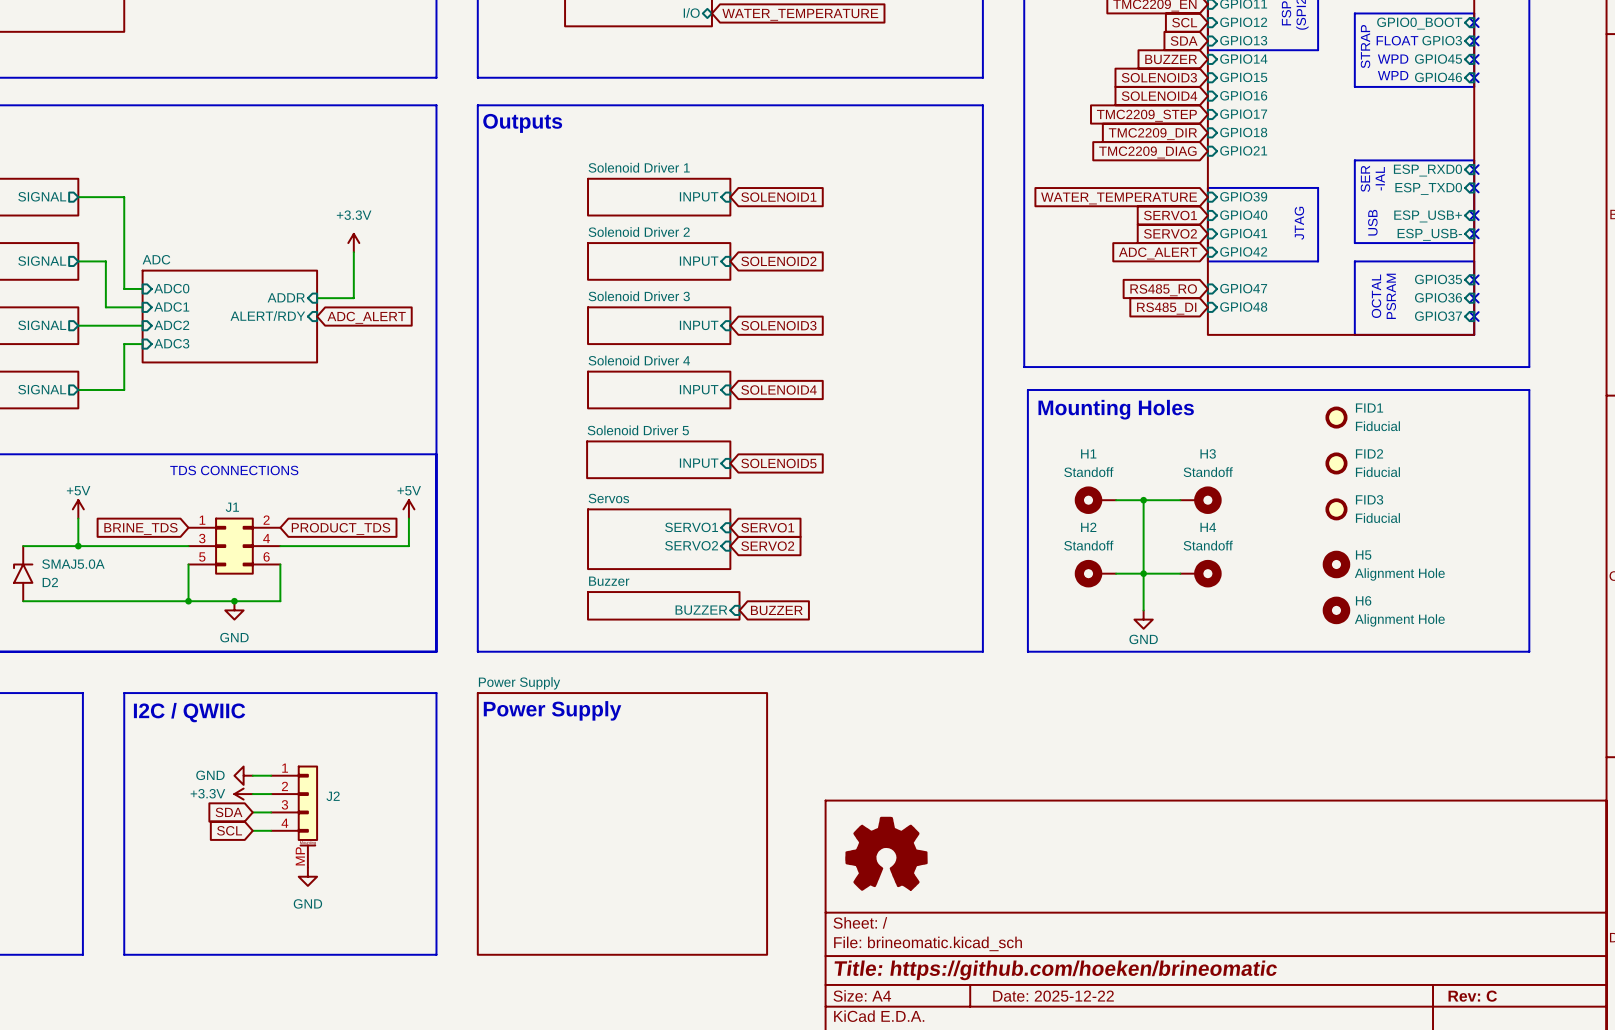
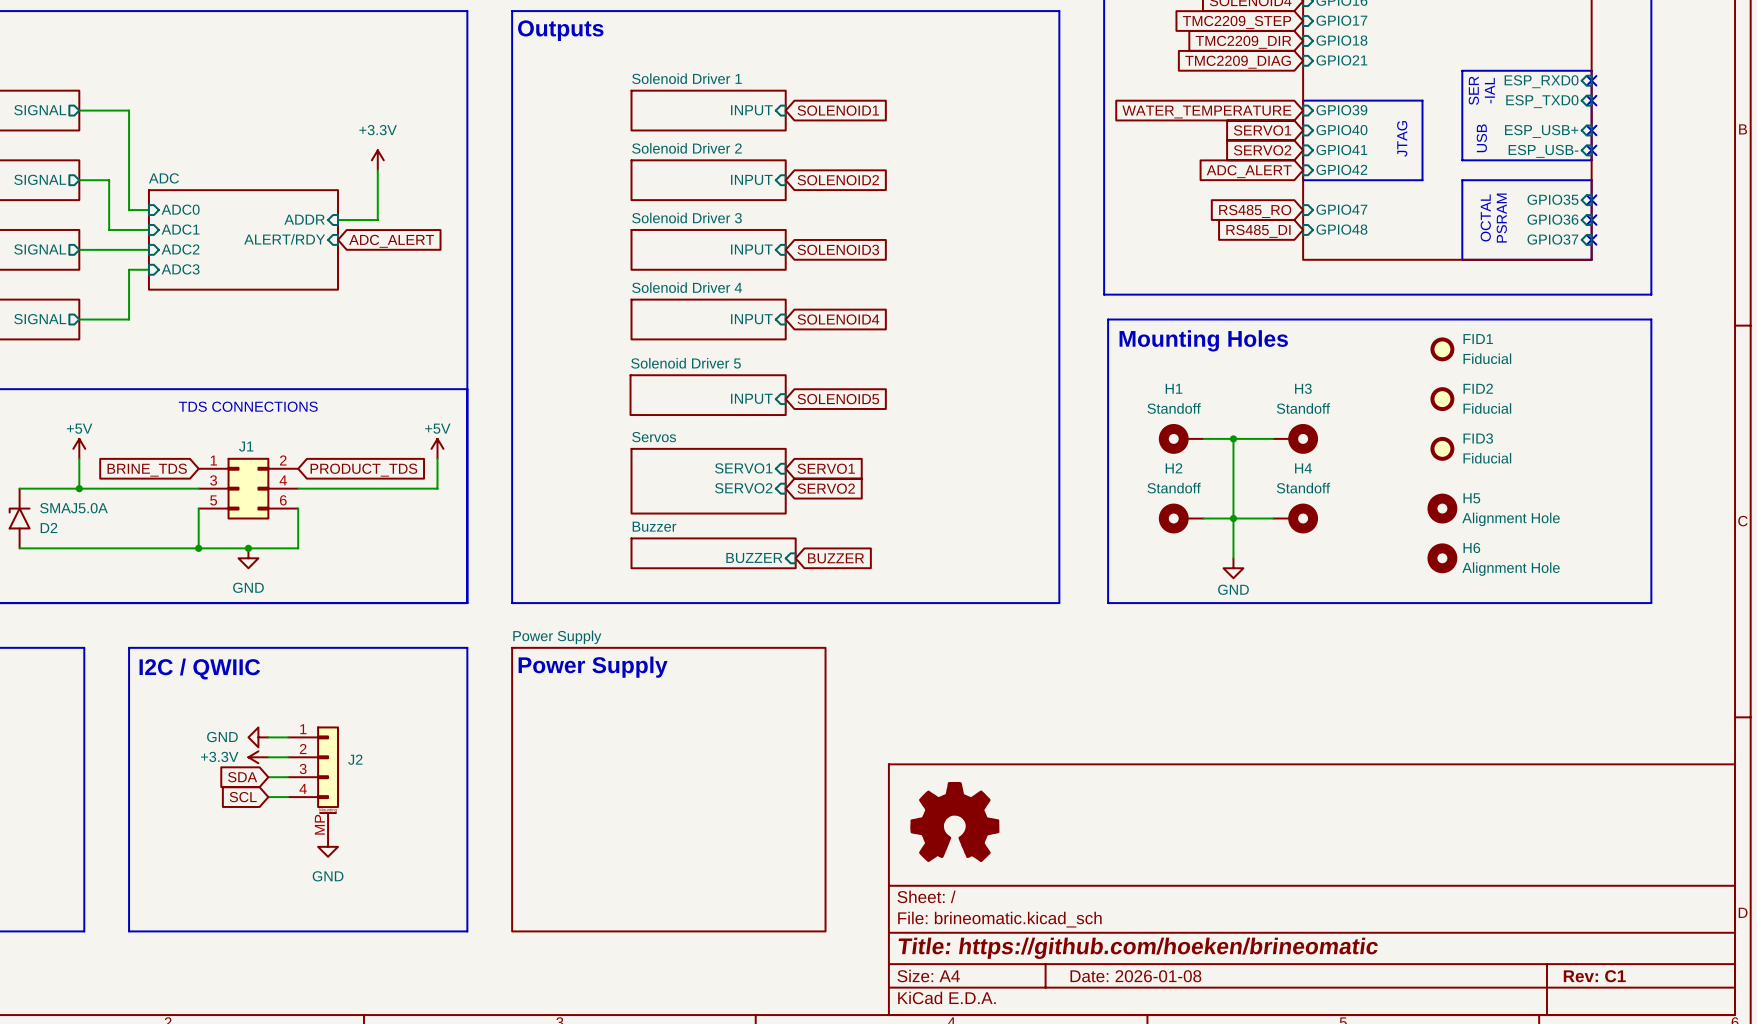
title block: Date: 2025-12-22 (1053, 996) -> Date: 2026-01-08 (1135, 976)
title block: Rev: C (1472, 996) -> Rev: C1 (1594, 976)

